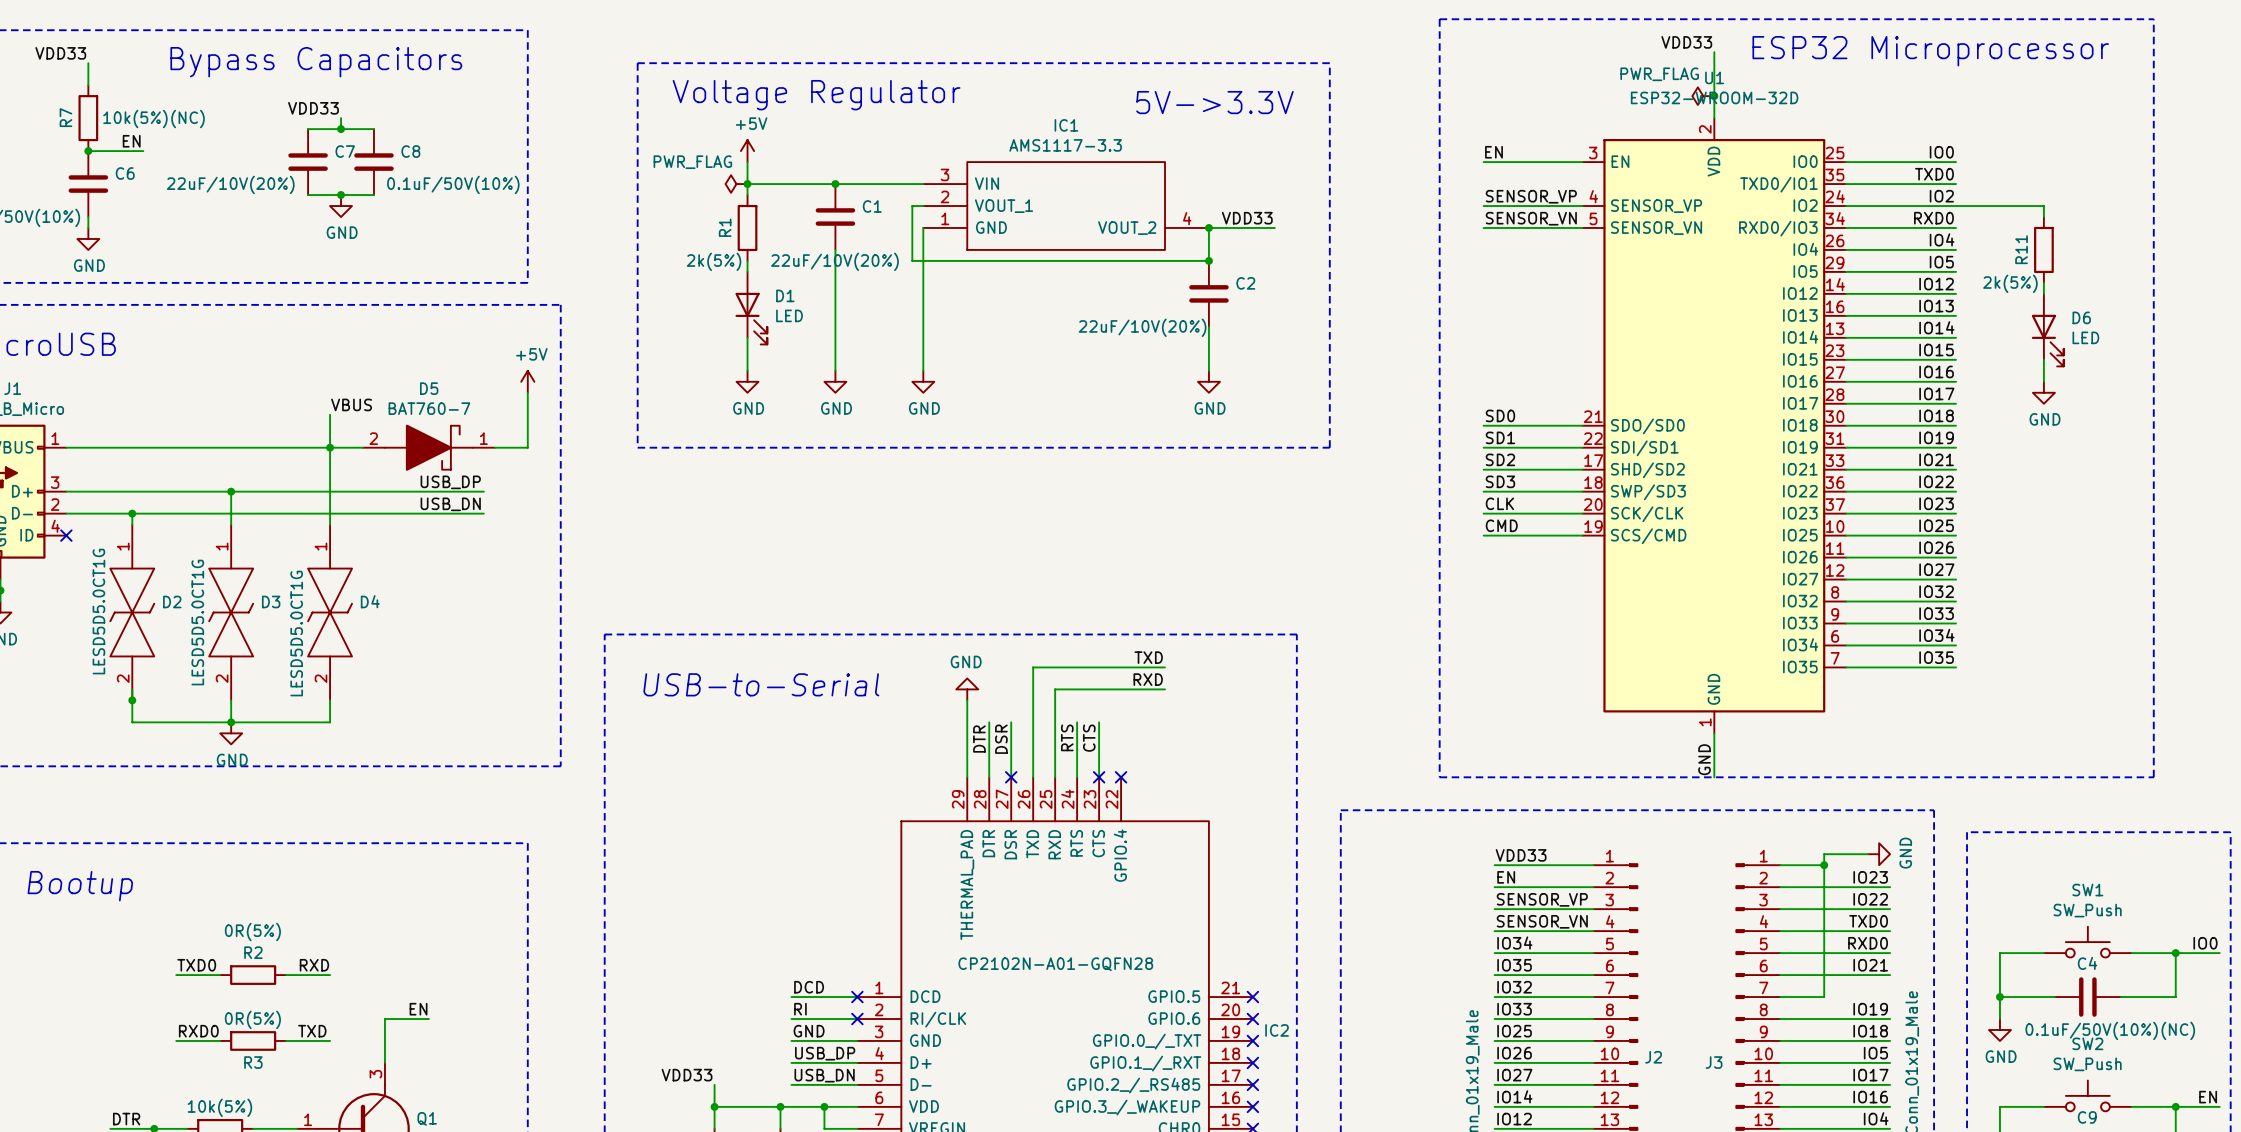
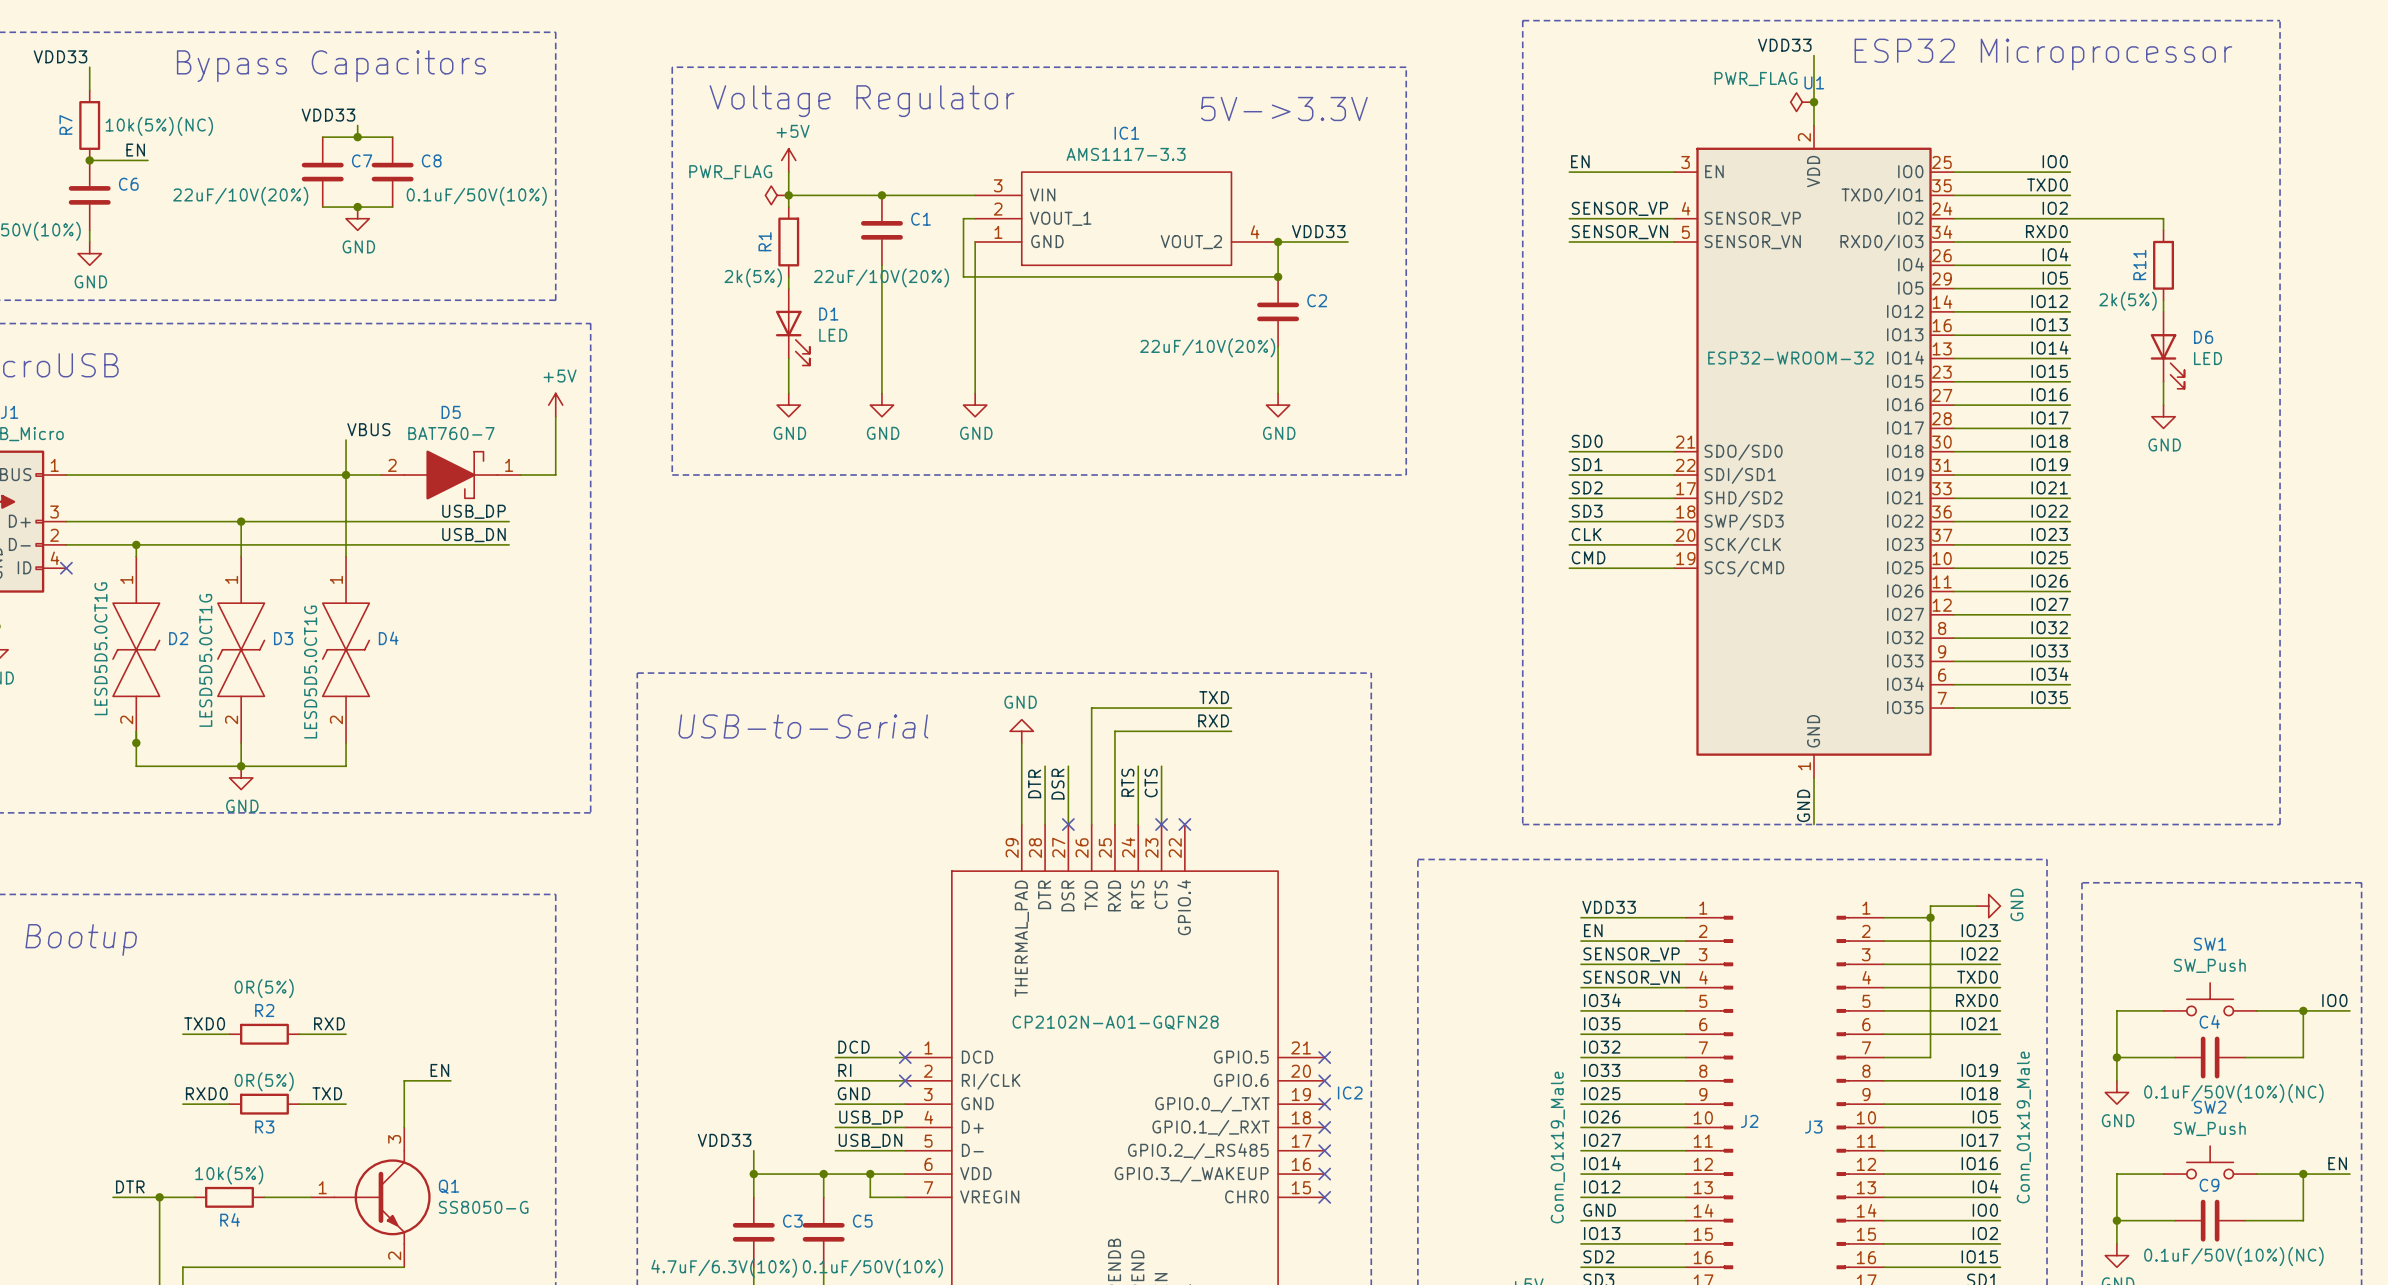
U1 value: ESP32-WROOM-32D (1714, 97) -> ESP32-WROOM-32 (1790, 358)

